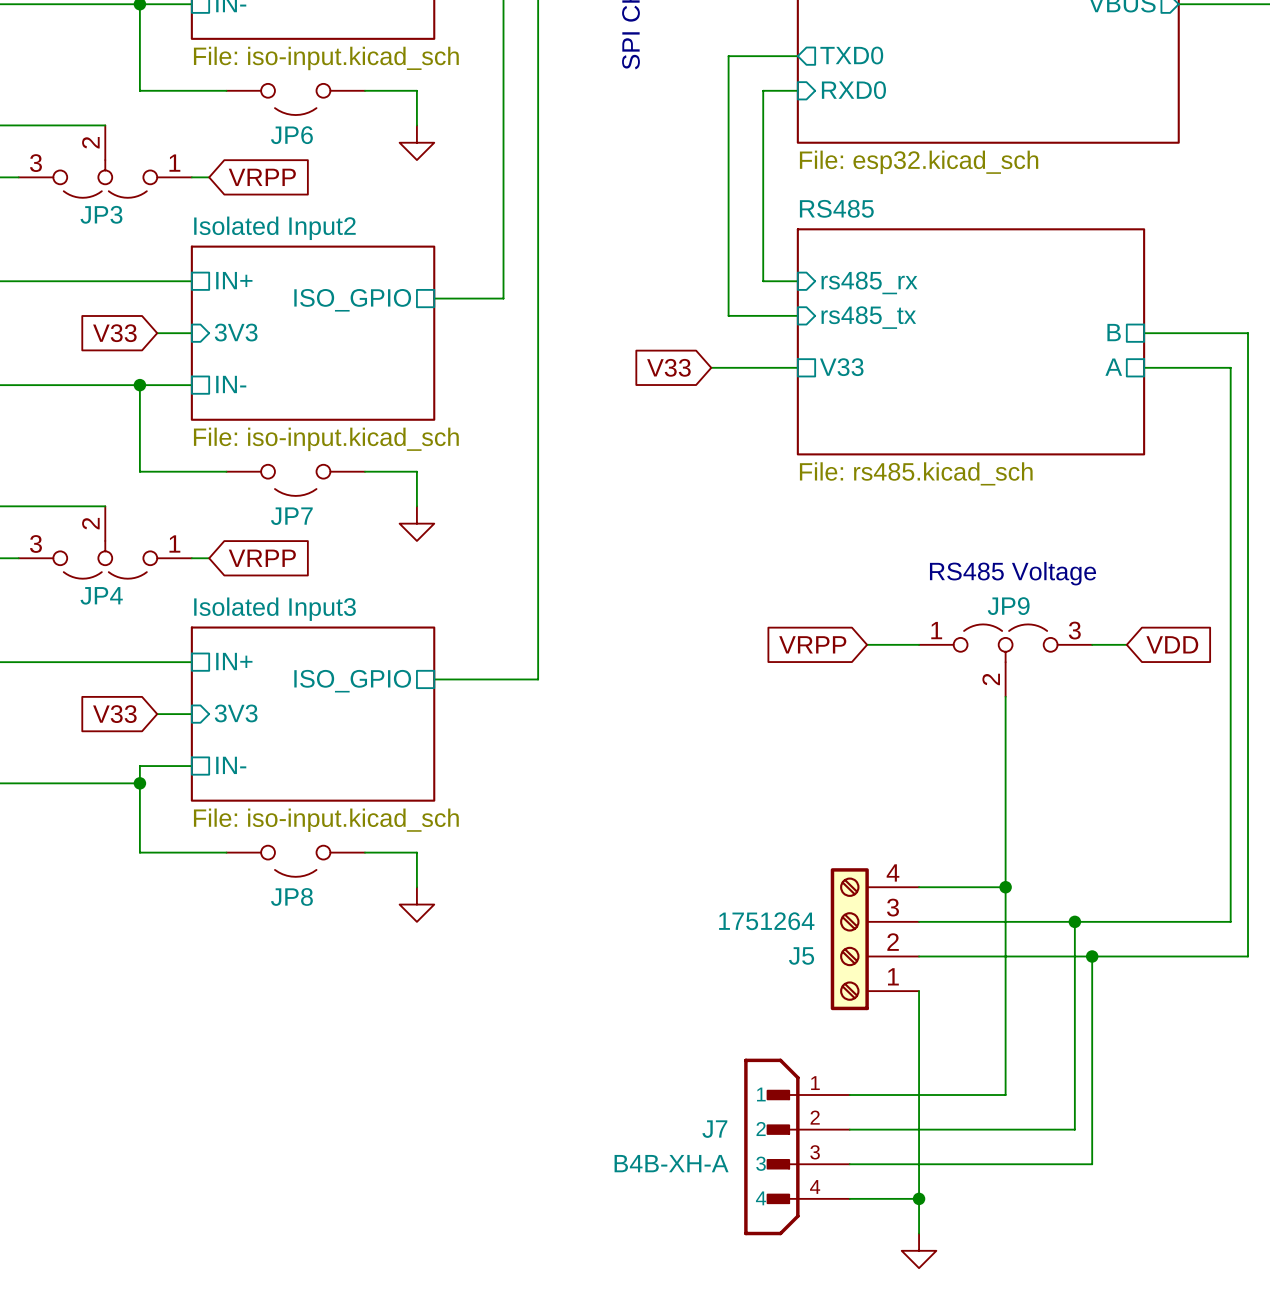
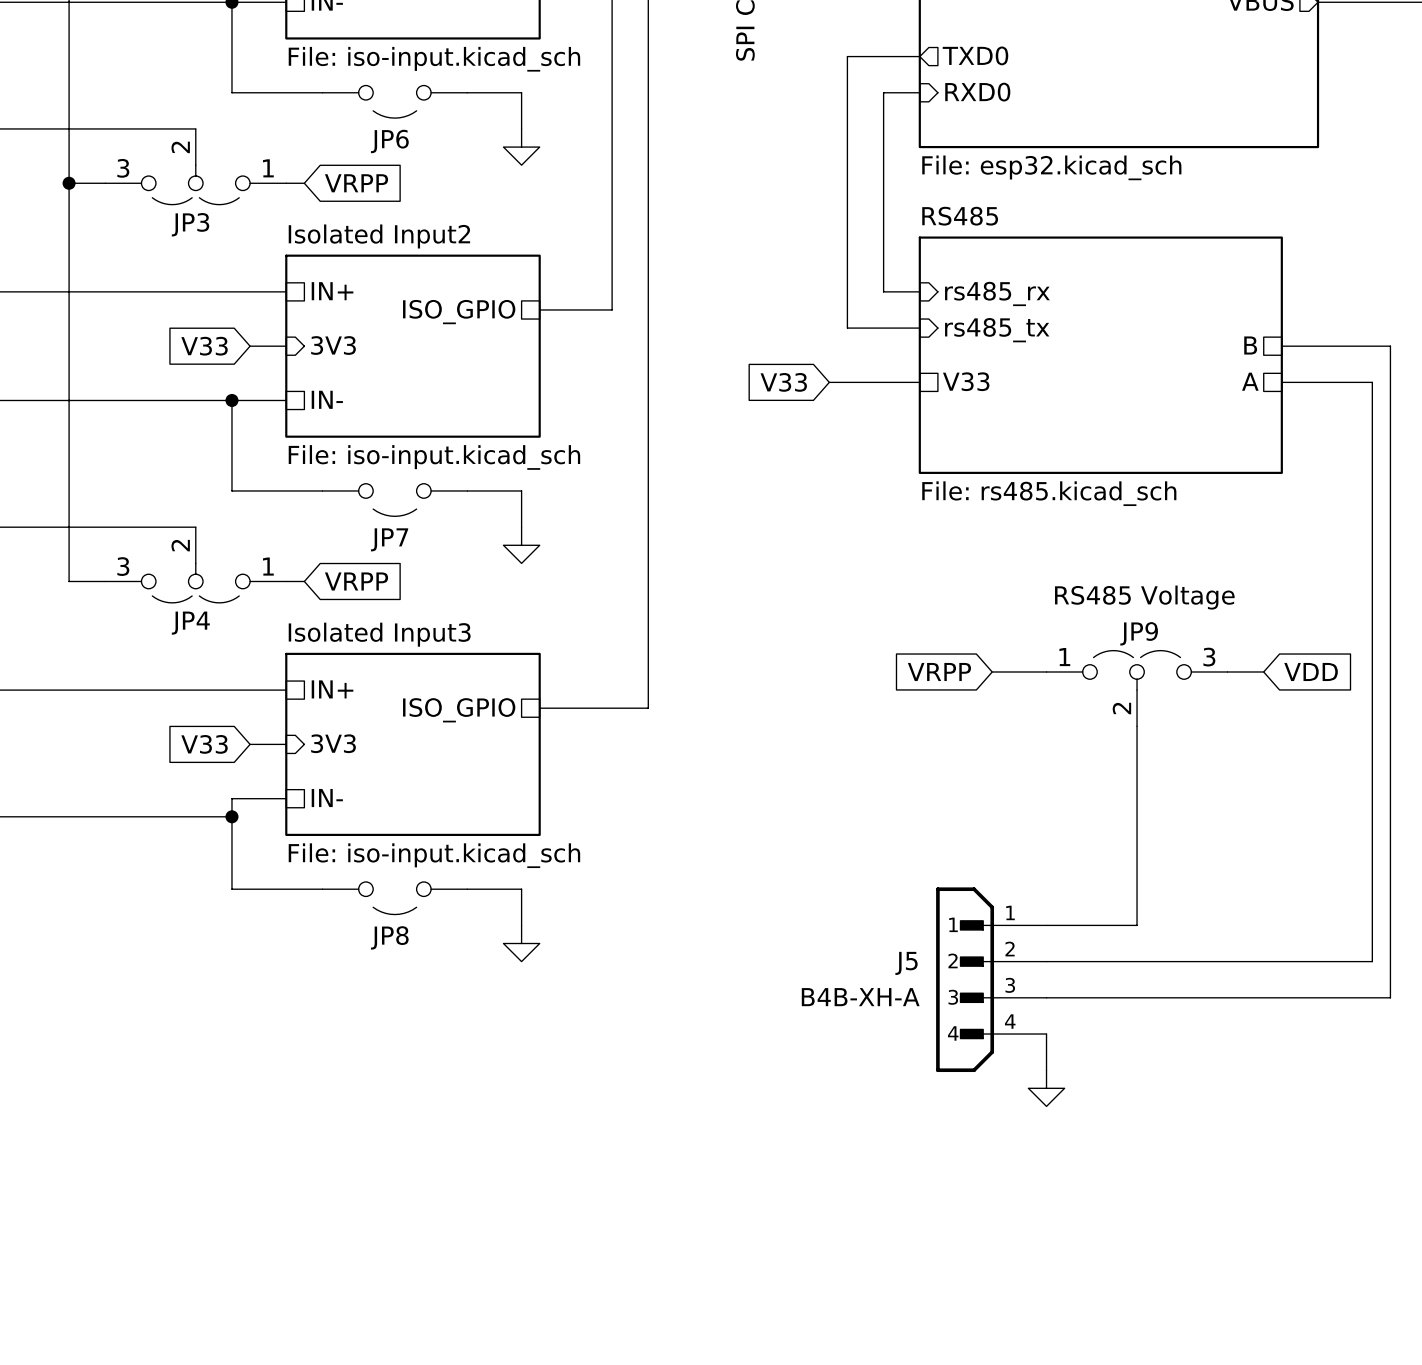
J5 symbol: [830, 868, 920, 1011] -> [936, 887, 1047, 1073]
wire: (1005, 887) (1005, 1095) (849, 1095) -> none
junction: (1005, 887) -> none
J5 value: 1751264 (766, 921) -> B4B-XH-A (860, 997)
wire: (1074, 921) (1074, 1129) (849, 1129) -> none
junction: (1074, 921) -> none
J5 name position: J5 (801, 955) -> J5 (906, 963)
wire: (1092, 956) (1092, 1164) (849, 1164) -> none
junction: (1092, 956) -> none
wire: (919, 1025) (919, 1233) -> none
J7: B4B-XH-A (796, 1146) -> none
wire: (849, 1198) (919, 1198) -> none
junction: (919, 1198) -> none
power symbol position: (919, 1250) -> (1046, 1088)

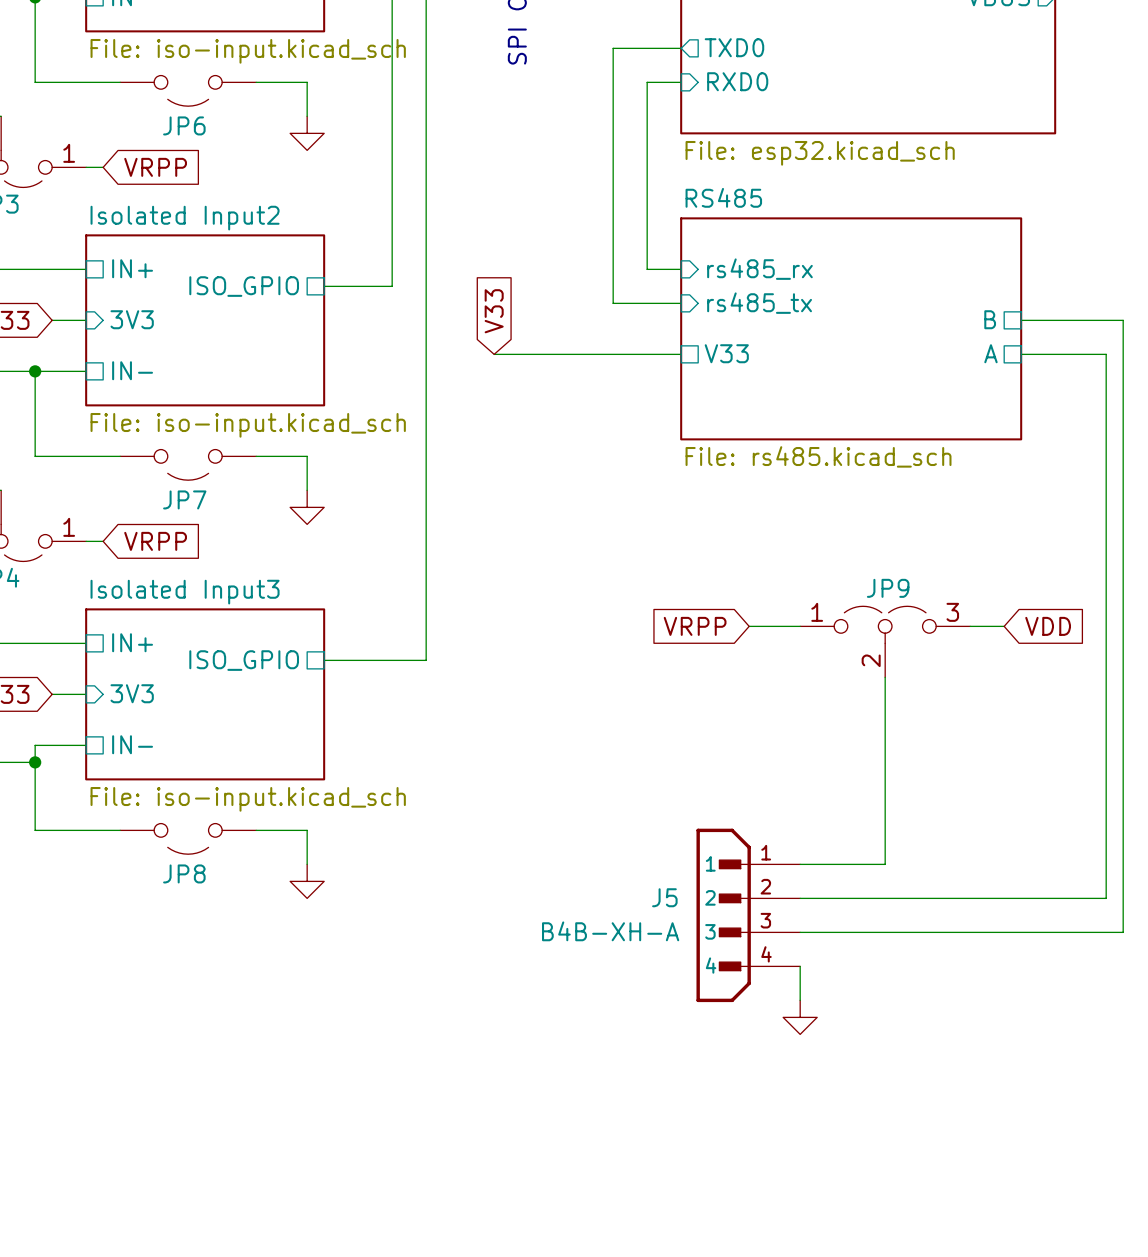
wire: none -> (494, 354) (596, 354)
global label rotation: 0° (783, 382) -> 90° clockwise (494, 311)
text: RS485 Voltage (1144, 597) -> none

